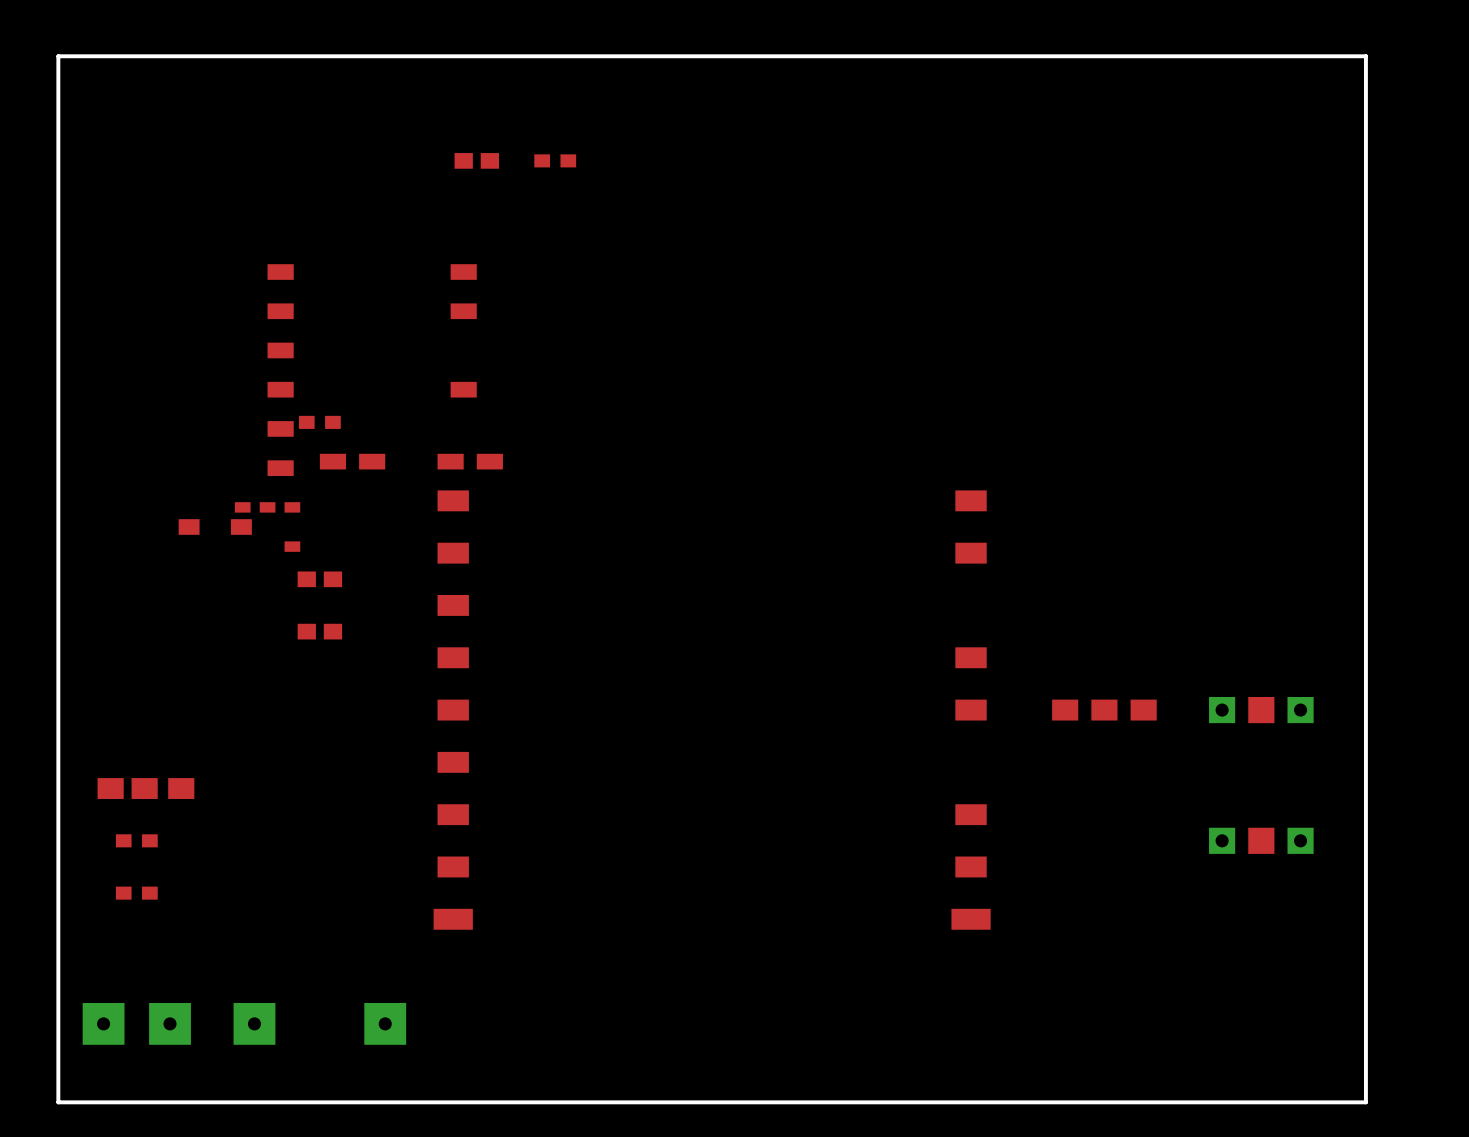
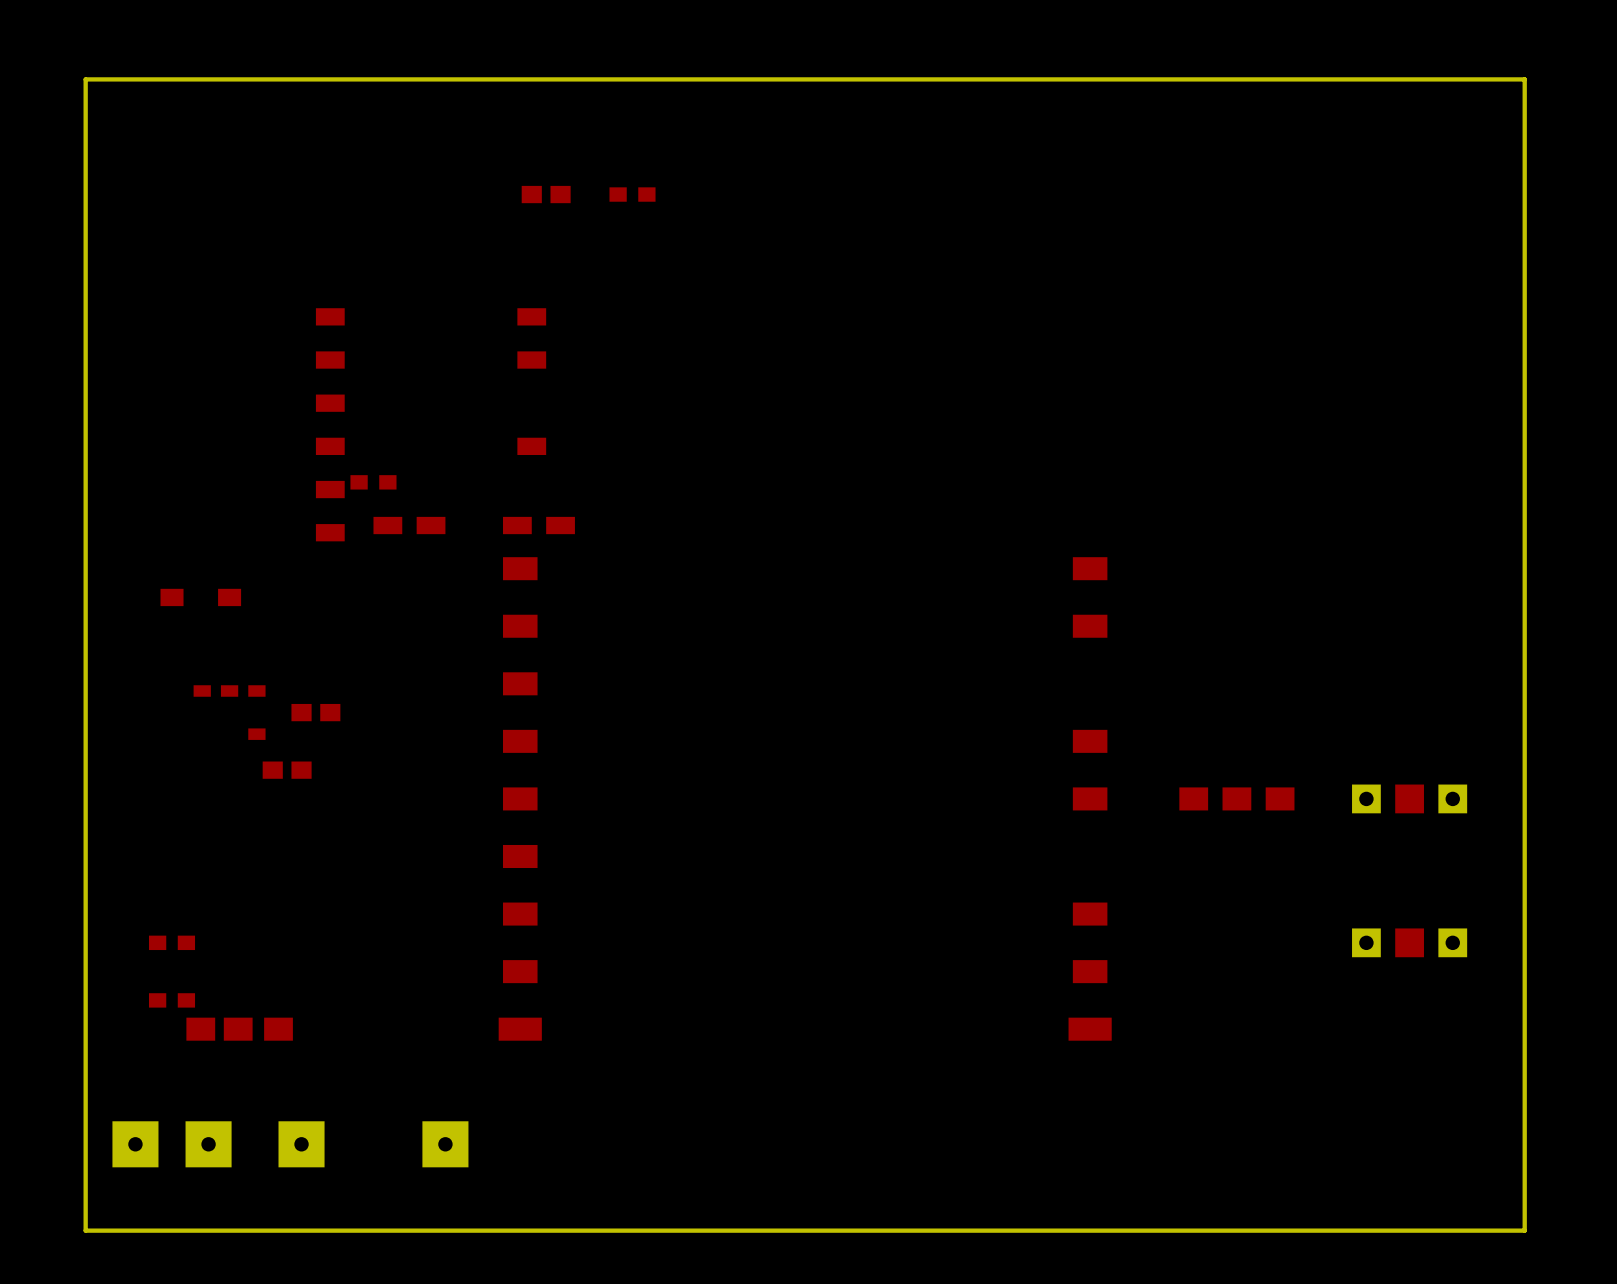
part position: (215, 527) -> (200, 597)
part position: (267, 527) -> (229, 712)
part: (319, 579) -> none
part: none -> (315, 712)
part: (319, 631) -> none
part: none -> (287, 770)
part position: (145, 788) -> (239, 1029)

